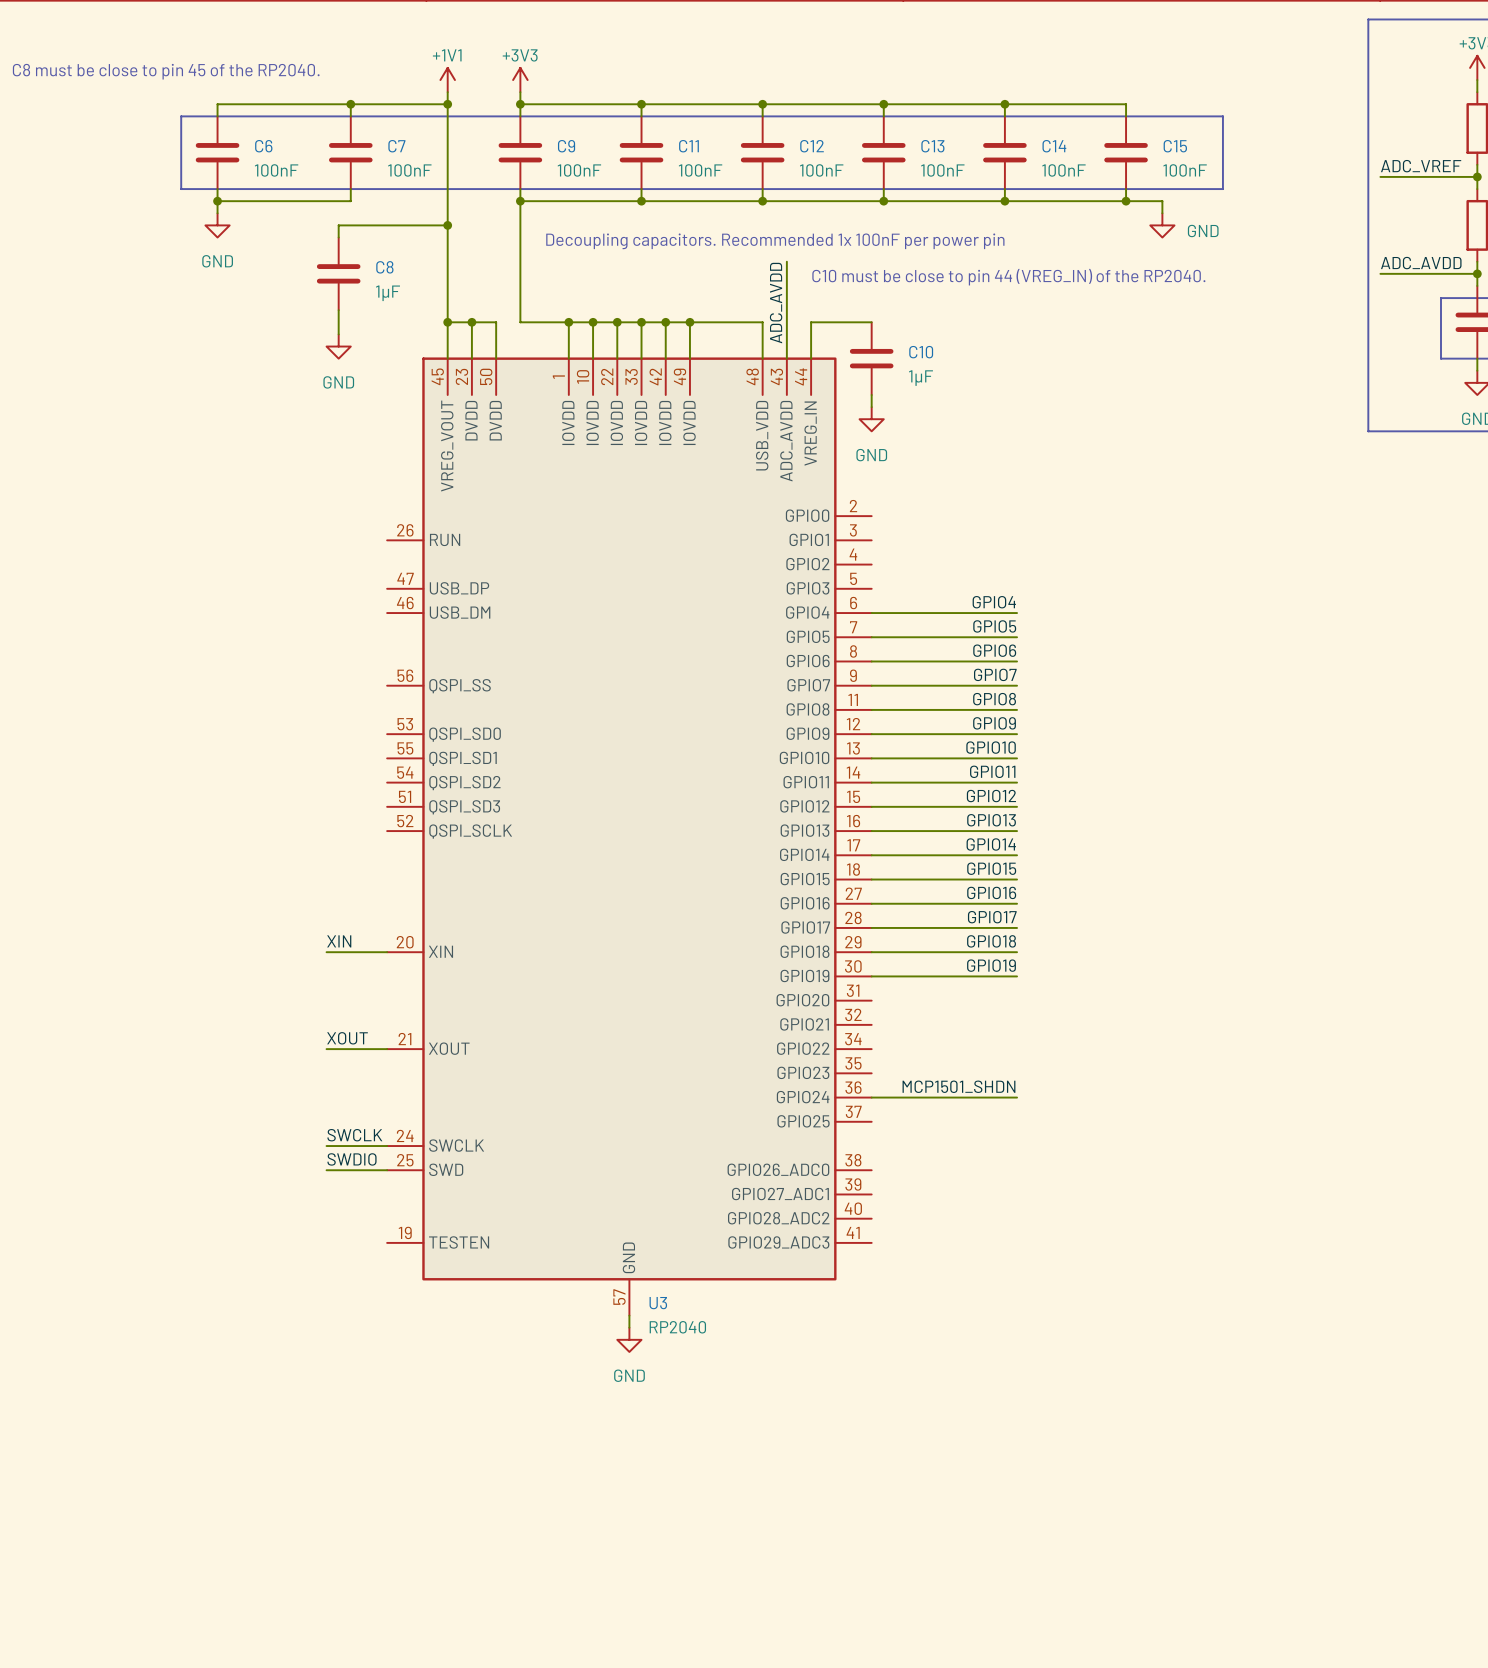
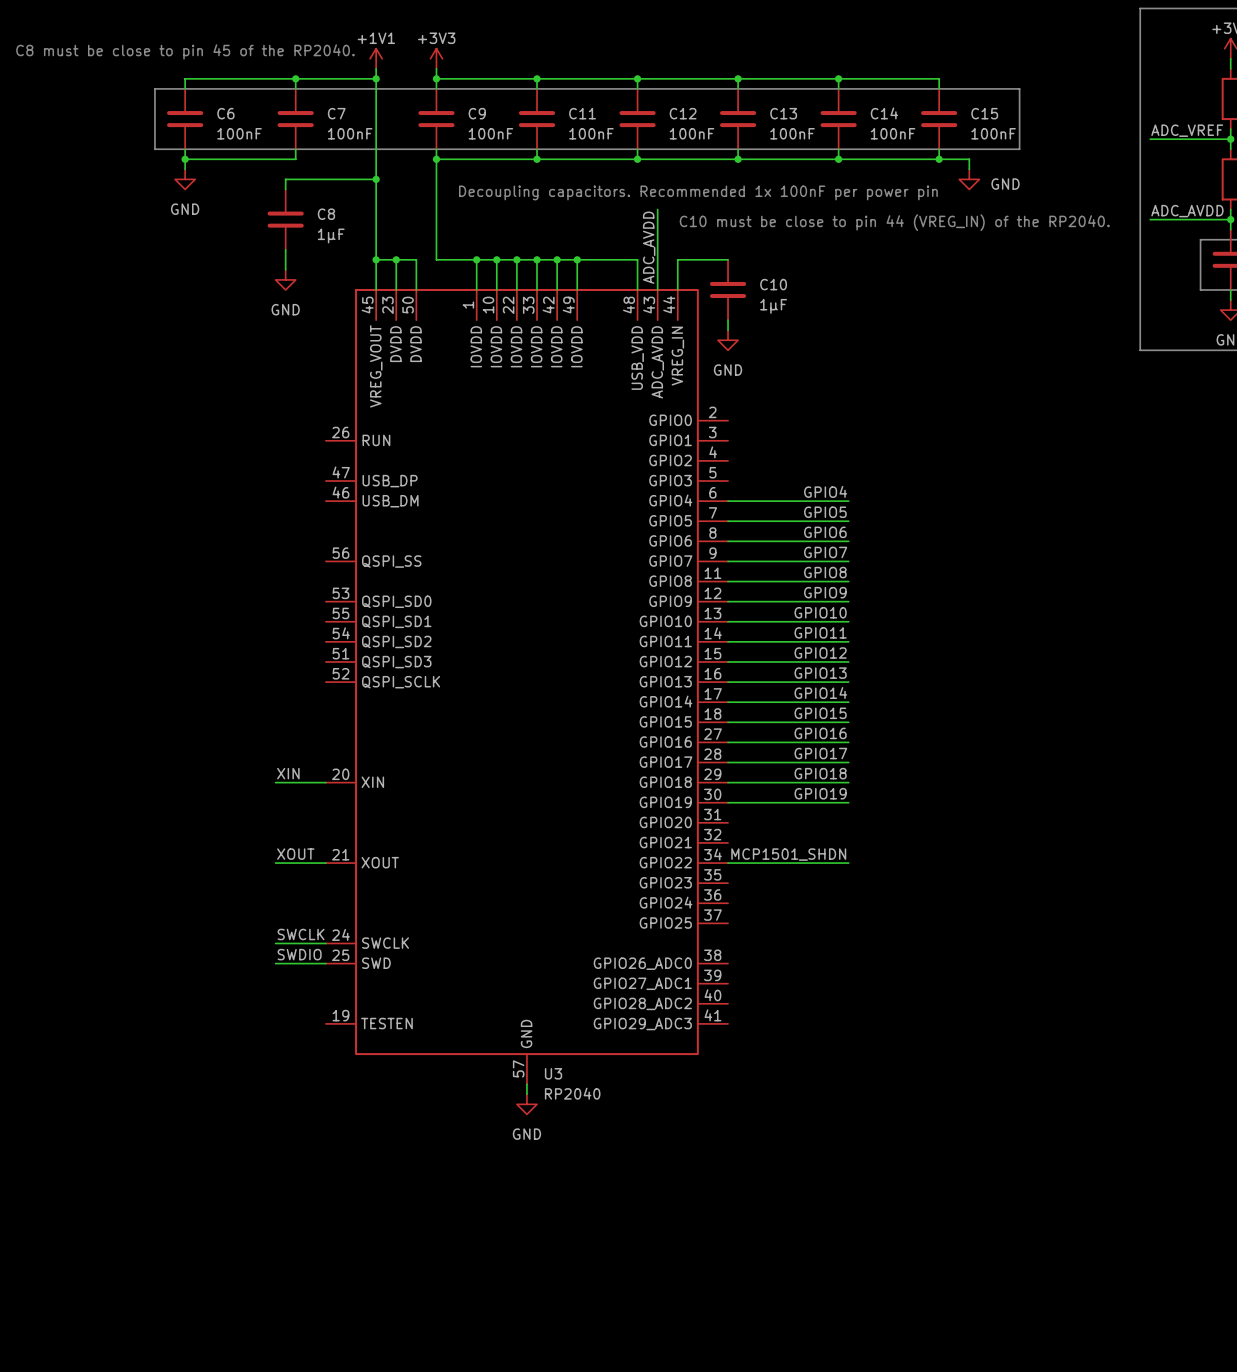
label position: MCP1501_SHDN (958, 1086) -> MCP1501_SHDN (788, 854)
wire: (871, 1097) (1017, 1097) -> (728, 863) (848, 863)

